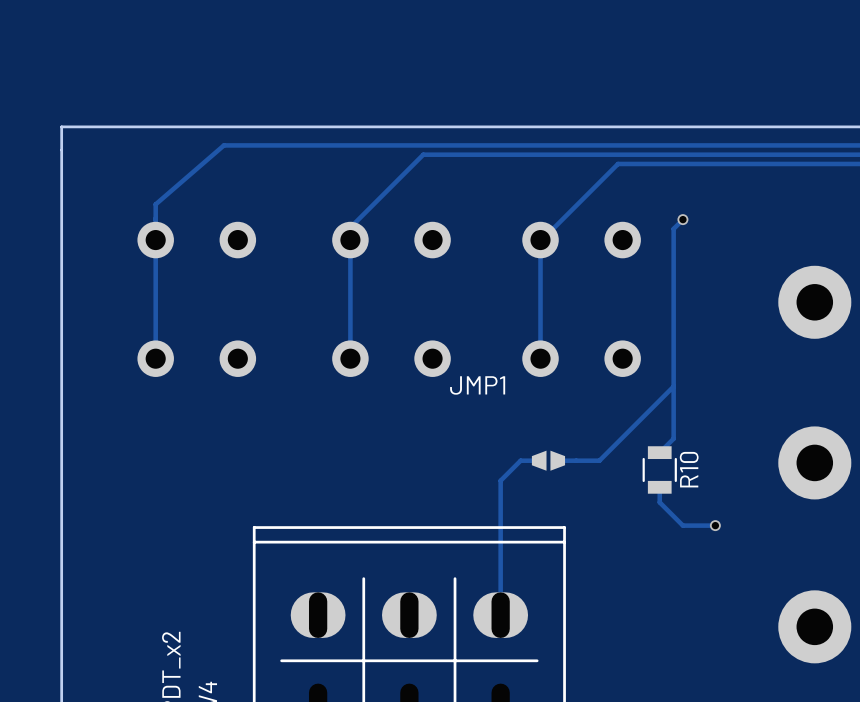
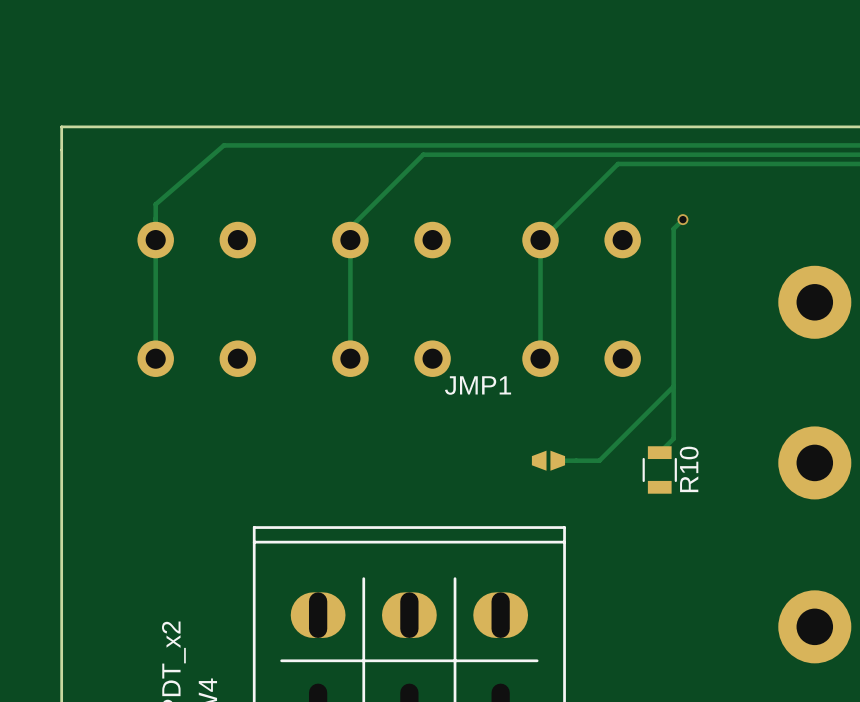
track: (539, 460) (520, 460) (500, 480) (500, 615) -> none
track: (659, 487) (659, 502) (682, 525) (715, 525) -> none
via: (715, 525) -> none

